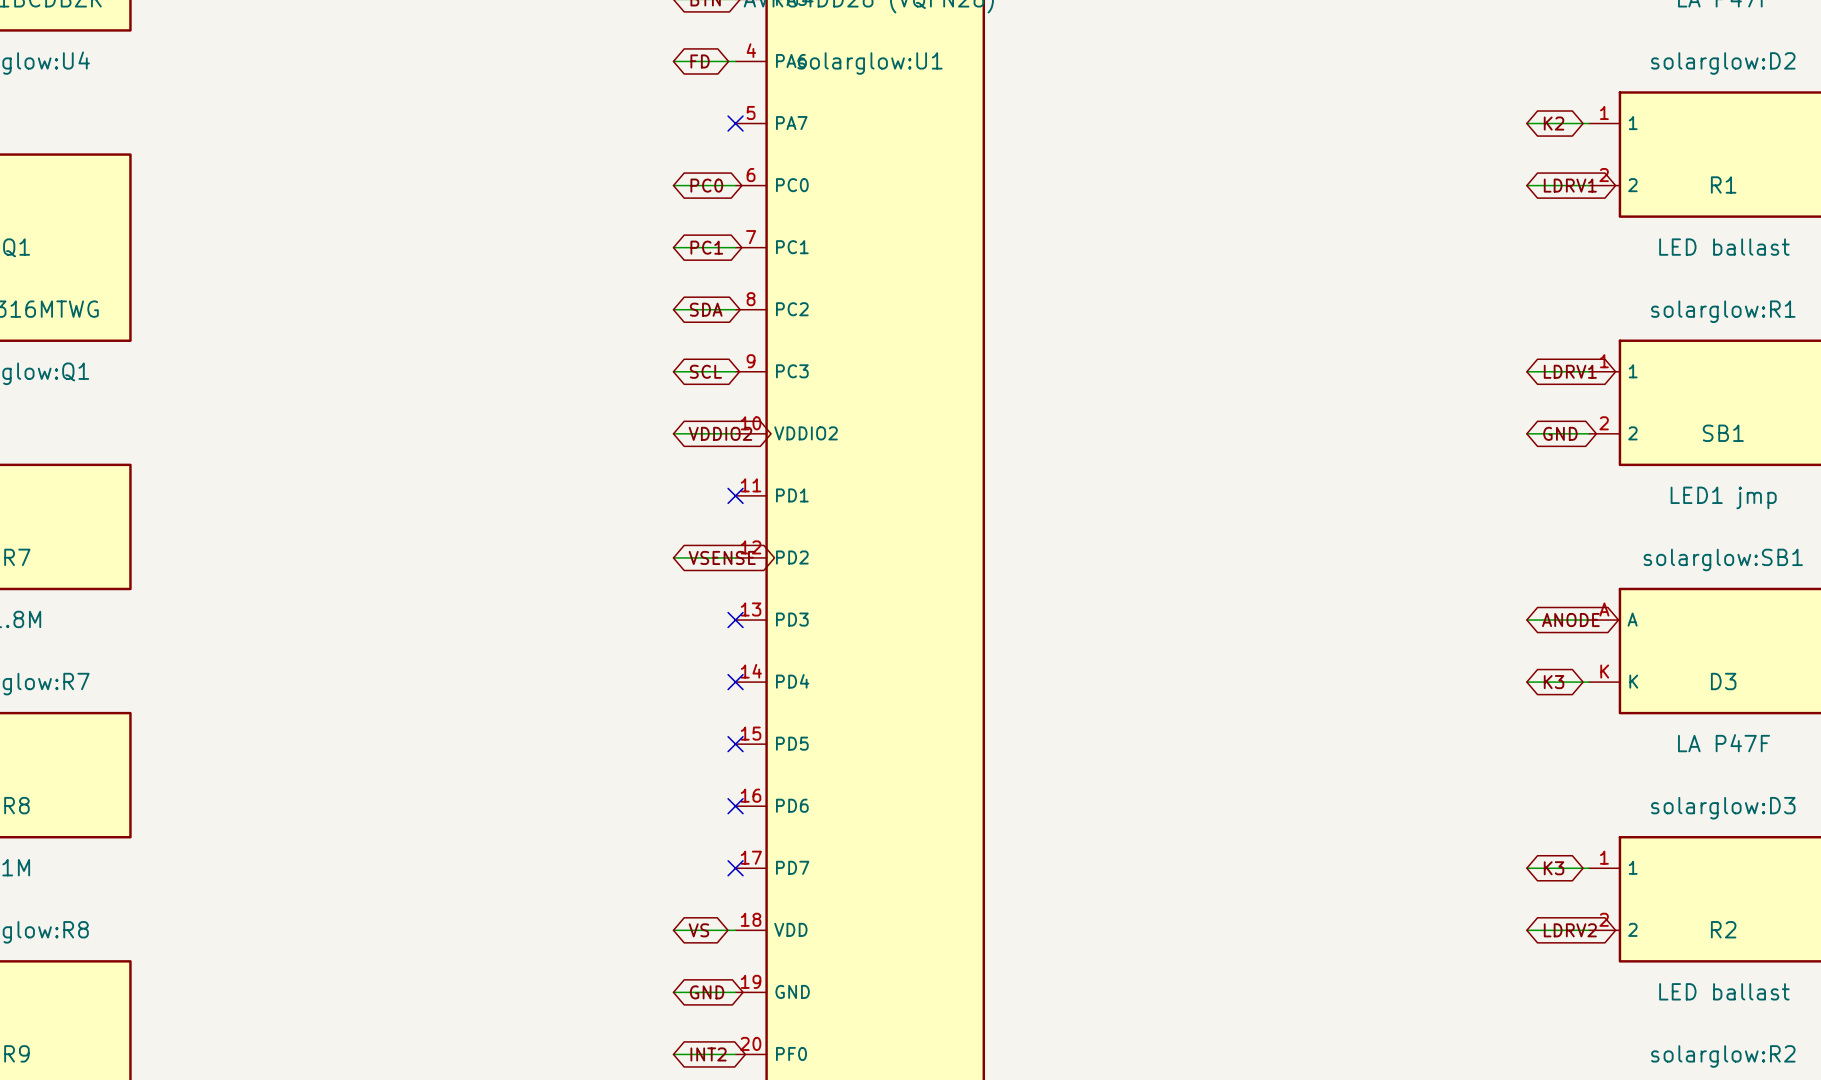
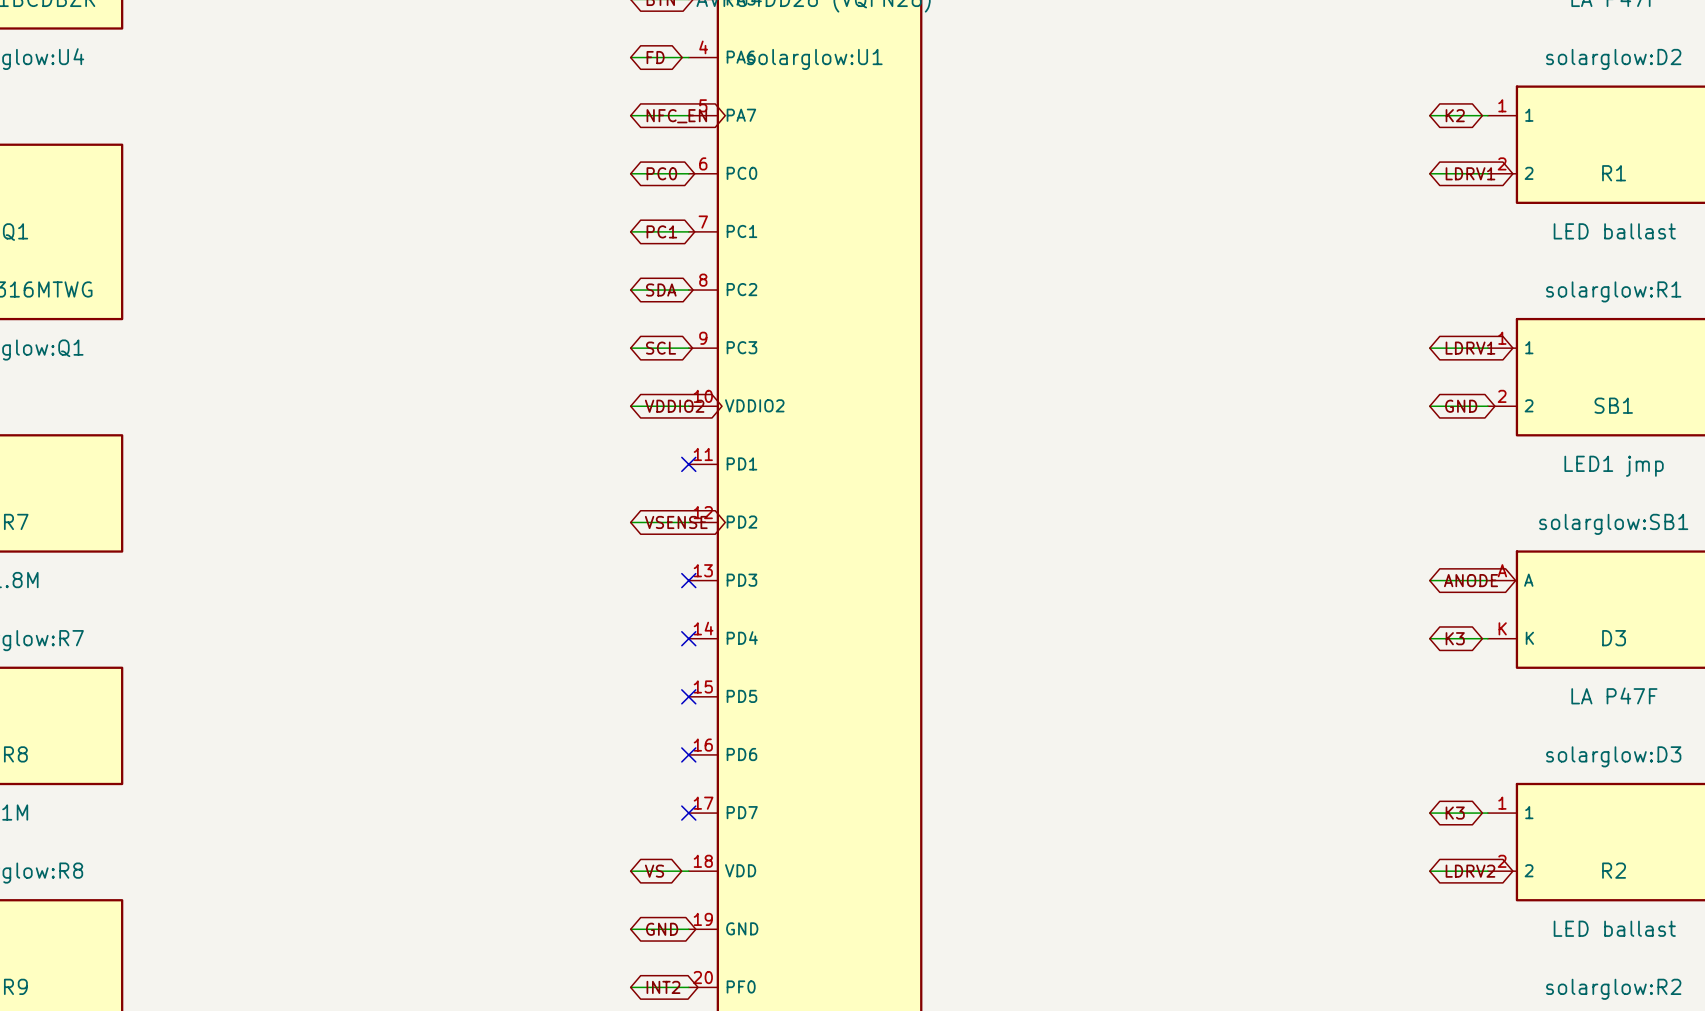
wire: none -> (630, 115) (688, 115)
no-connect mark: (735, 123) -> none
global label: none -> NFC_EN (676, 116)

